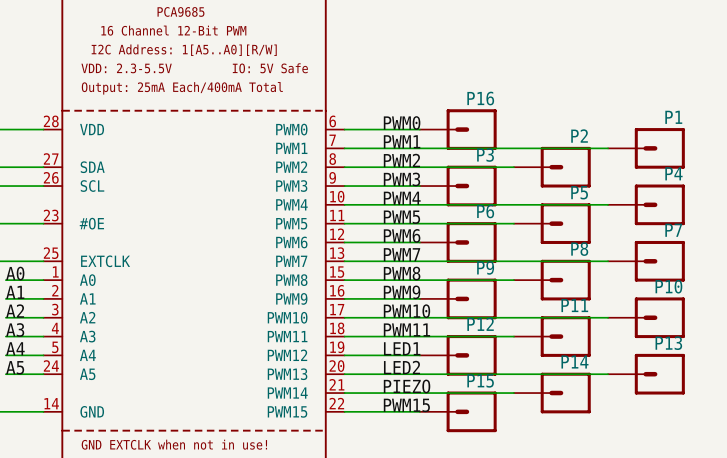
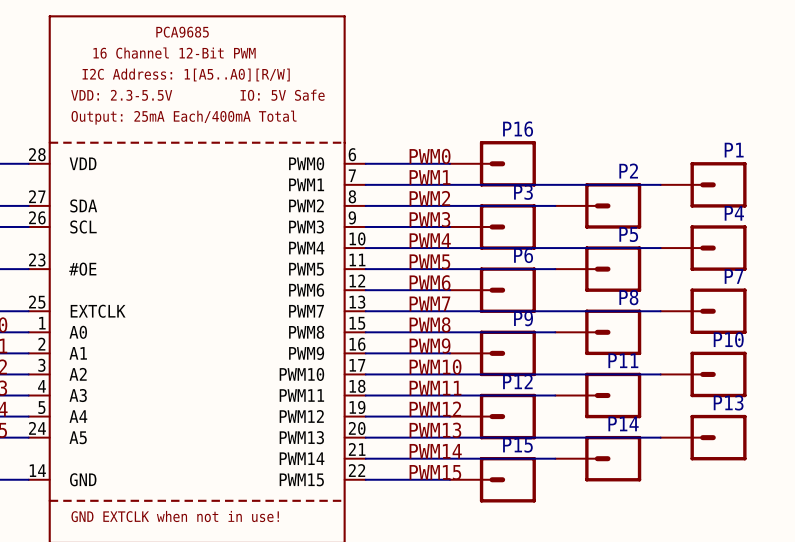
label: LED1 (402, 348) -> PWM12 (435, 409)
label: LED2 (401, 367) -> PWM13 (435, 430)
label: PIEZO (407, 386) -> PWM14 (435, 451)

